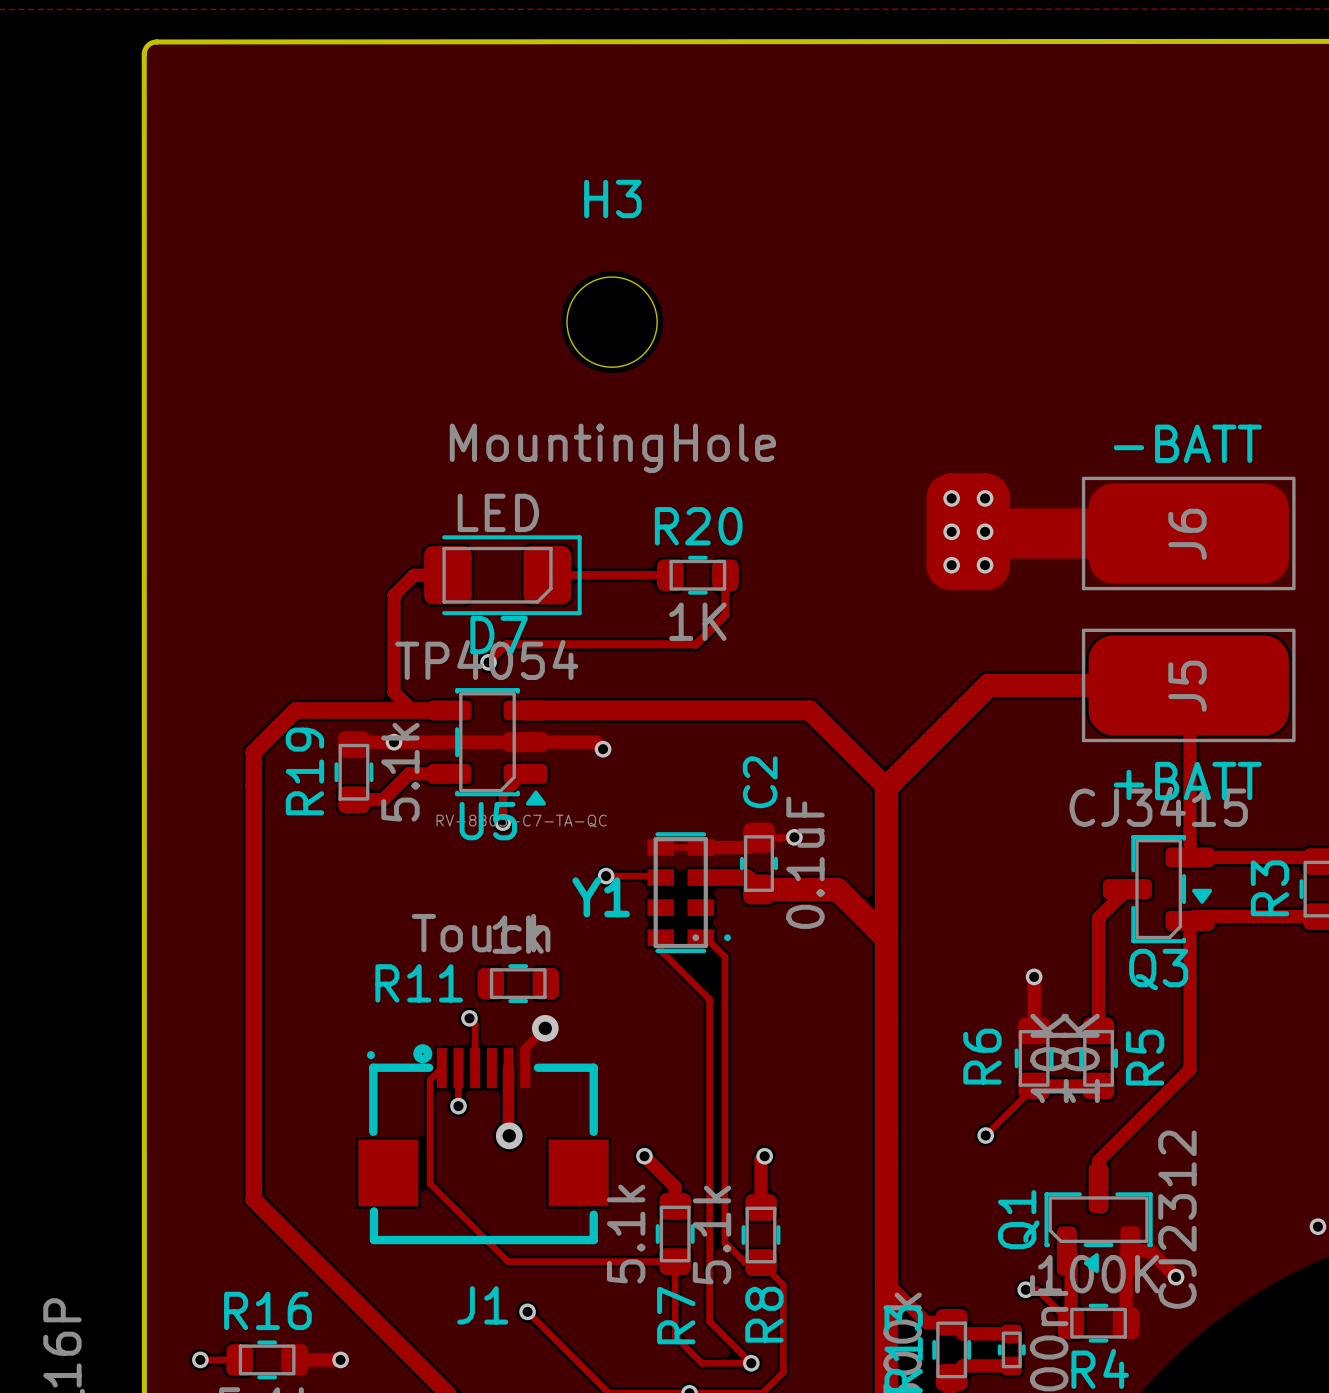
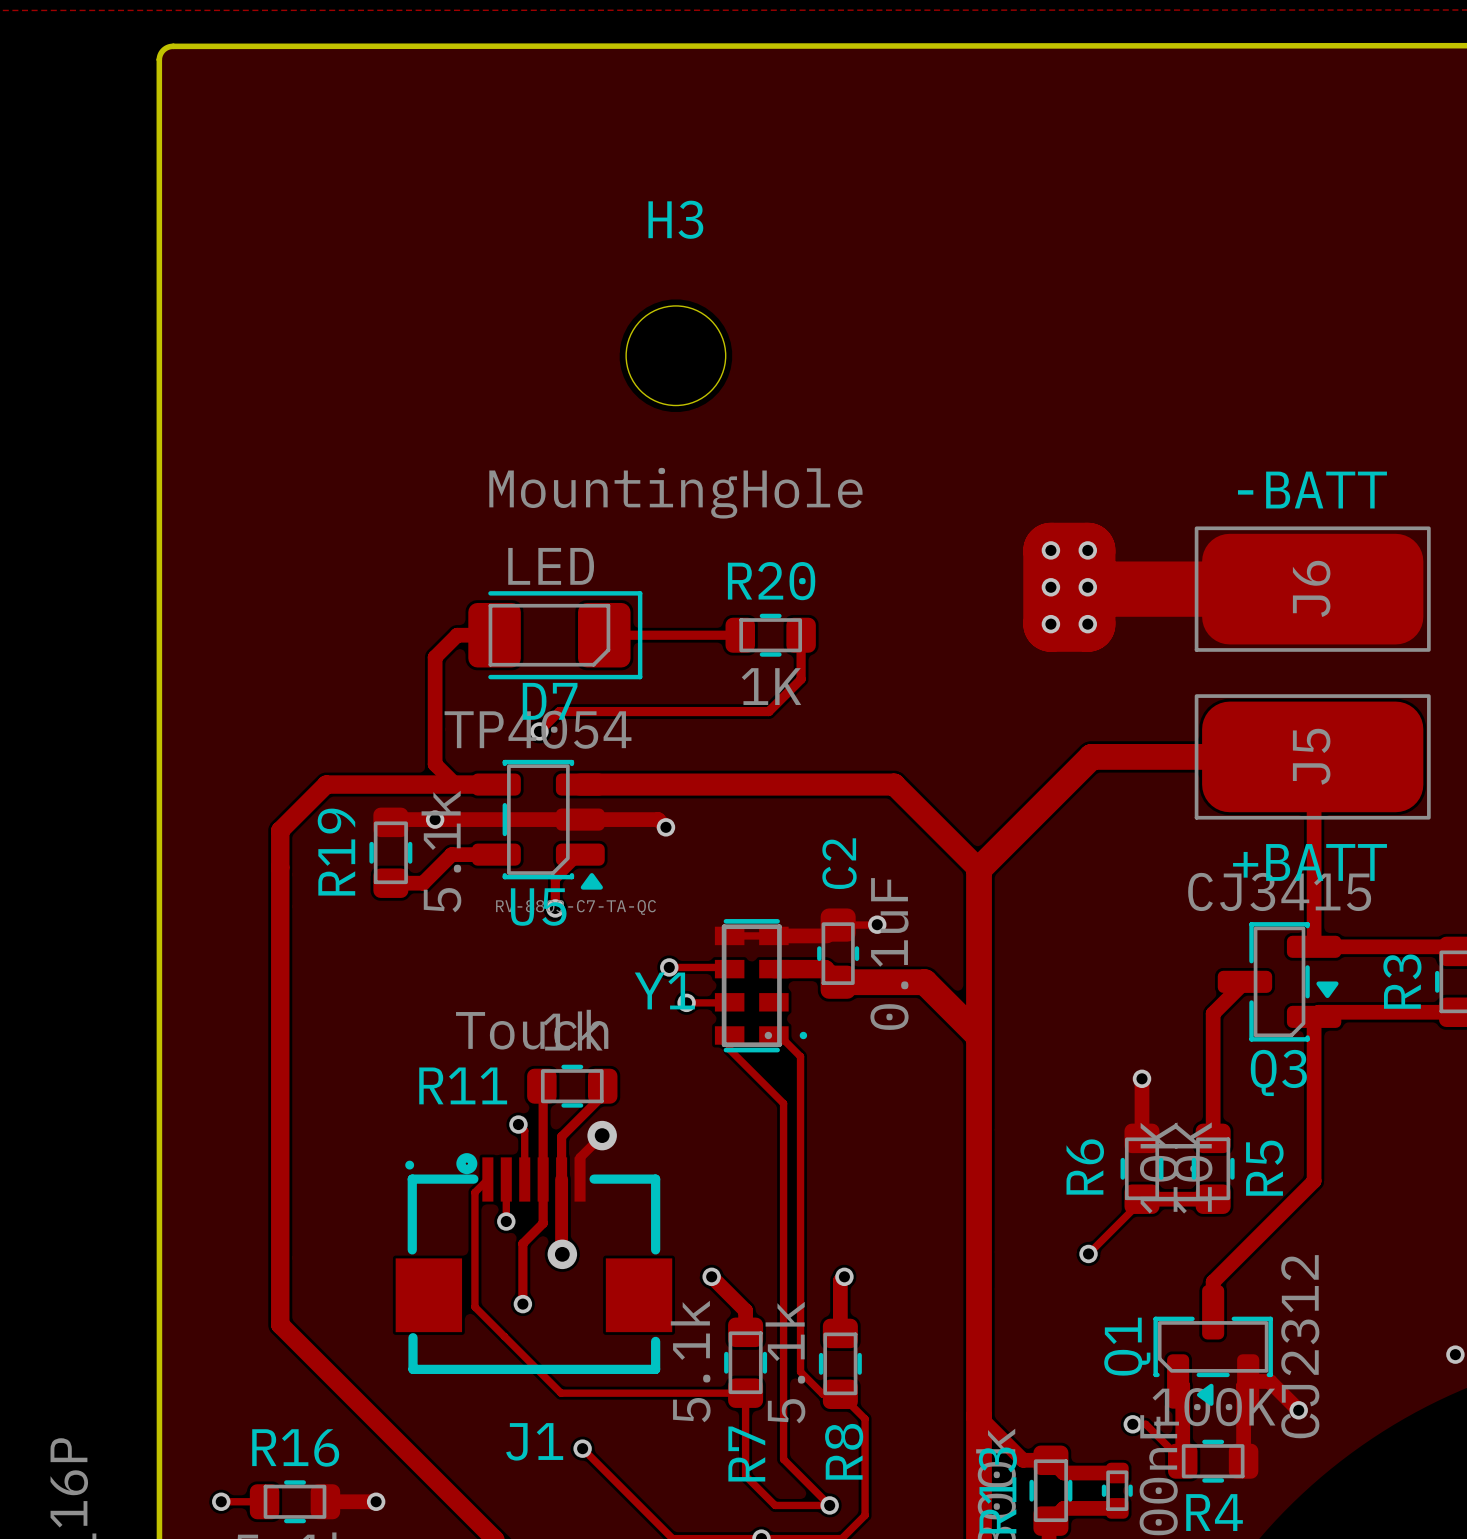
track: none -> (729, 1002) (686, 1002)
via: none -> (686, 1002)
track: none -> (541, 1086) (543, 1223) (522, 1243) (522, 1304)
track: none -> (602, 1086) (602, 1095) (561, 1136) (561, 1179)
via: none -> (522, 1304)

